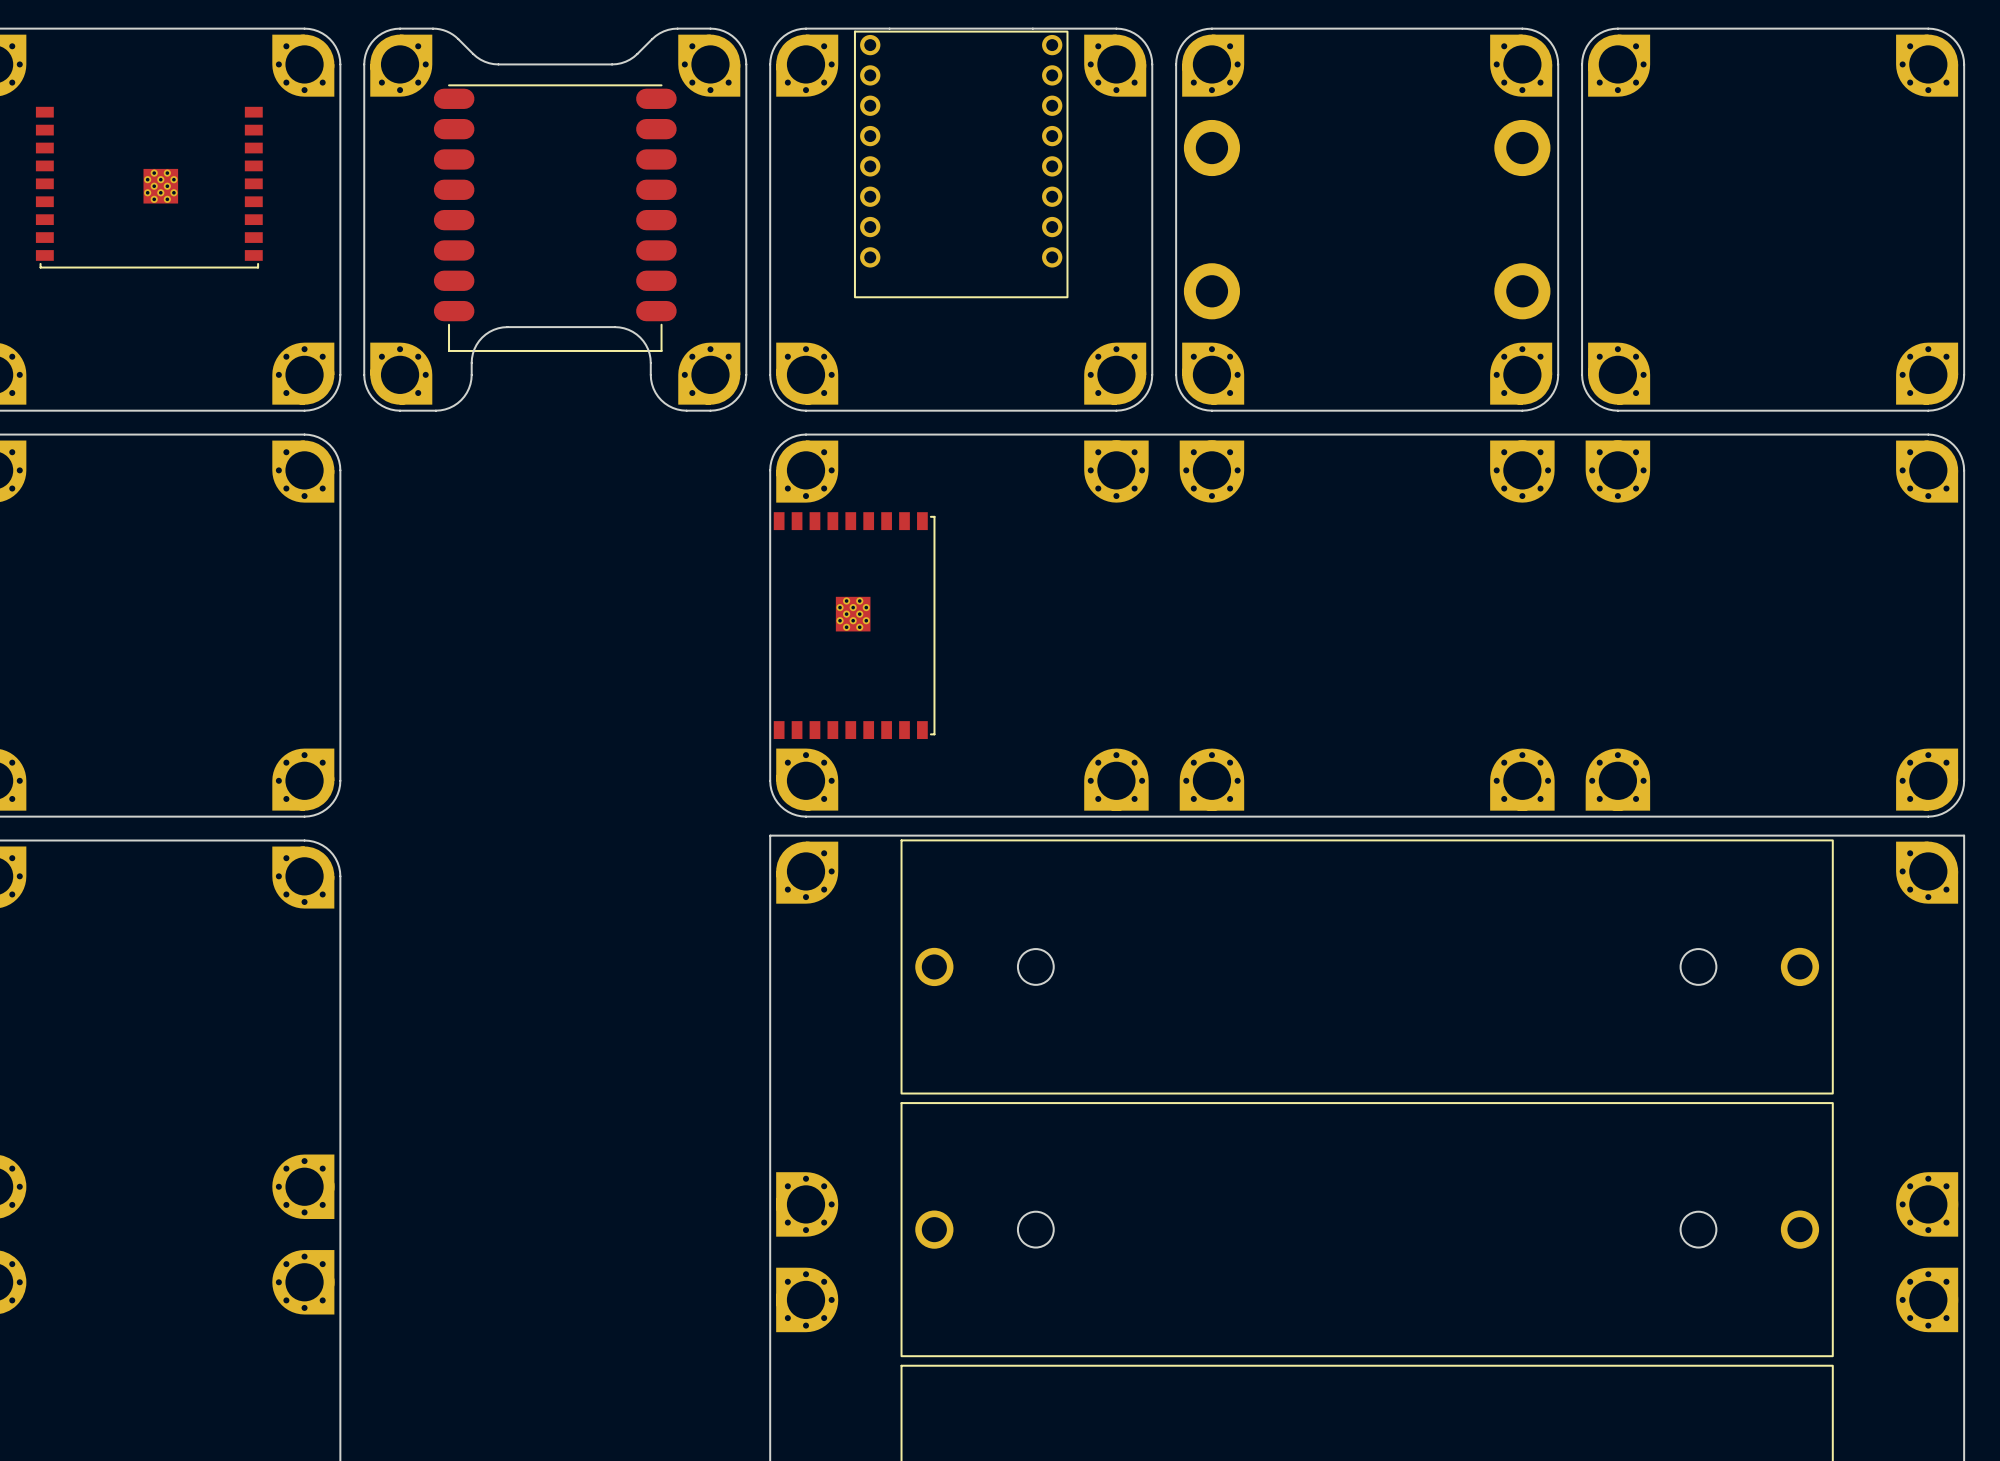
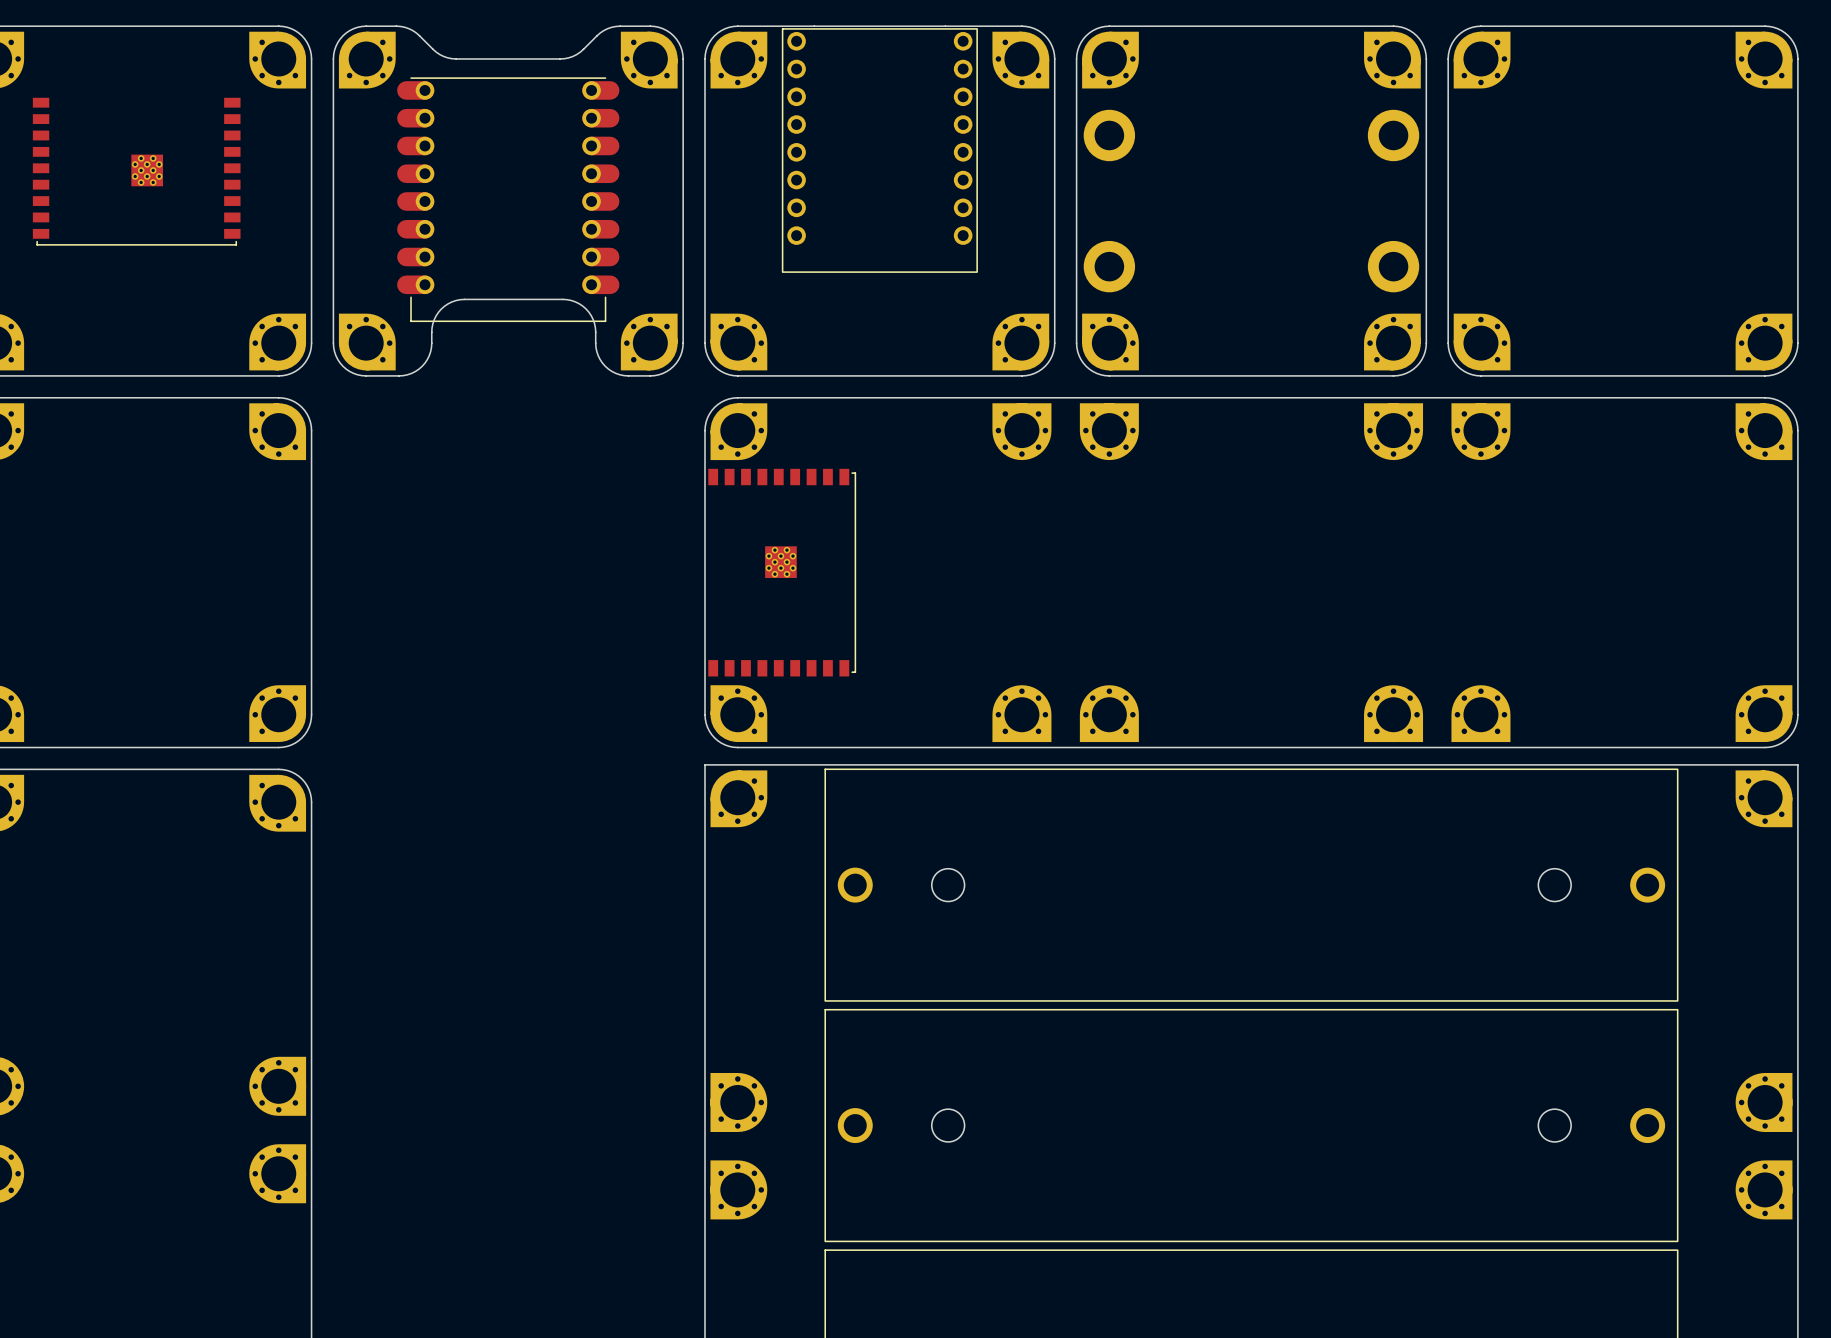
part footprint: [433, 84, 677, 352] -> [397, 77, 620, 322]

